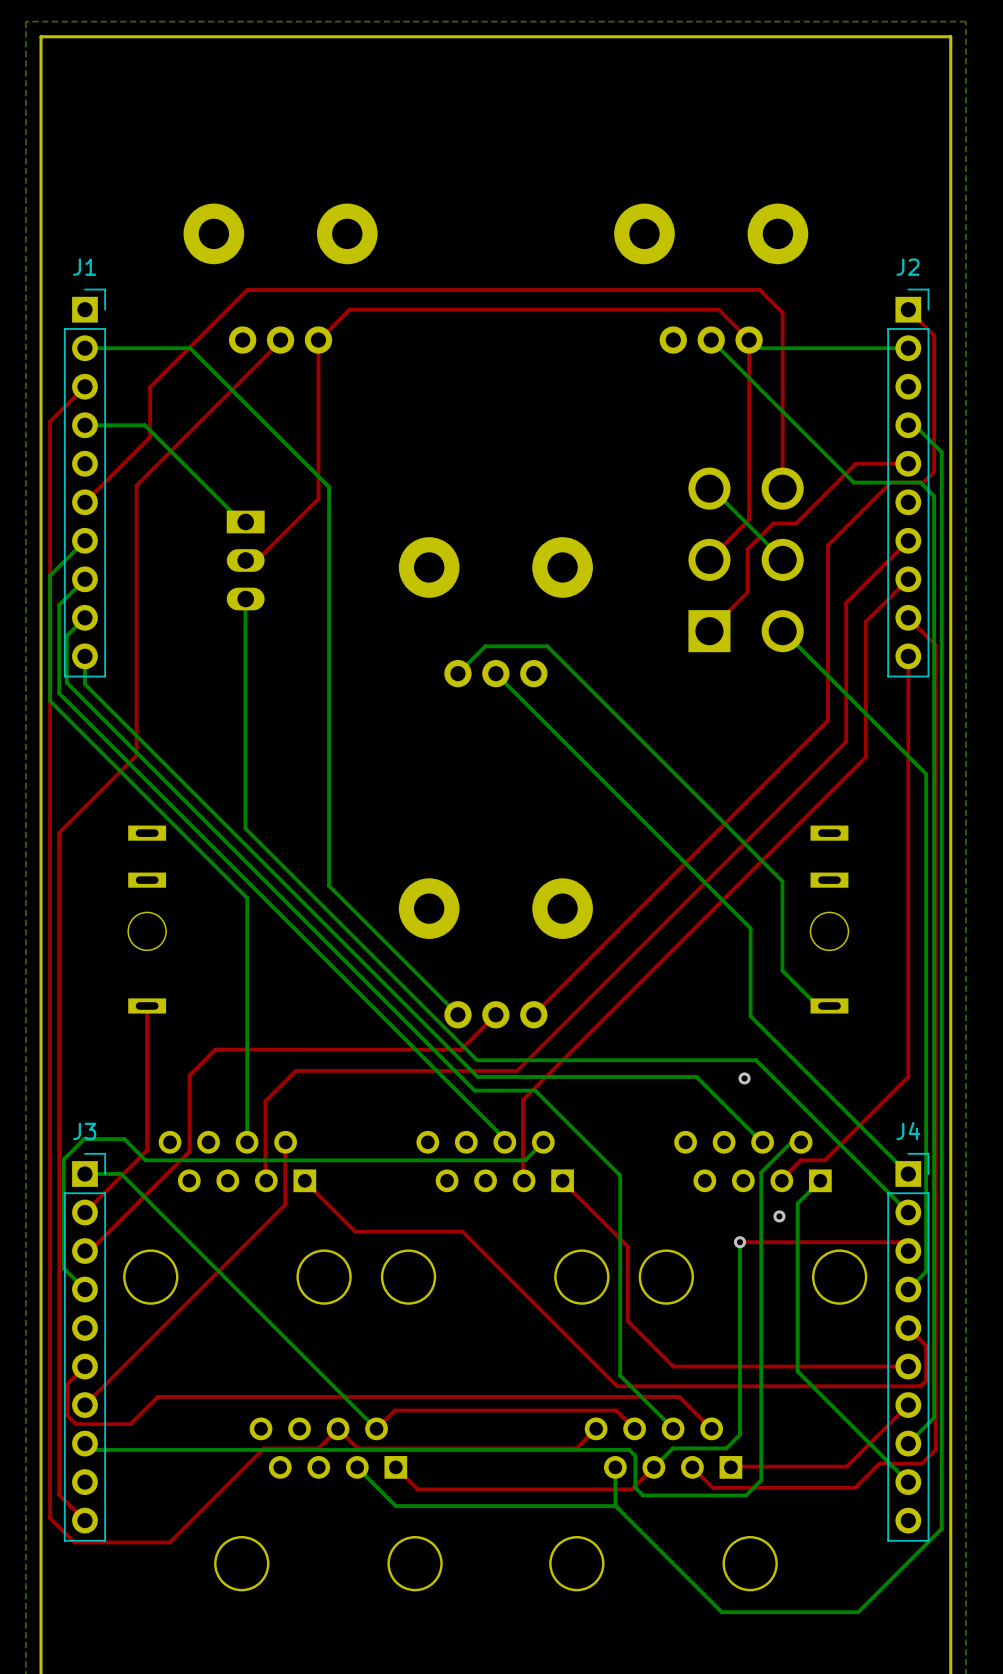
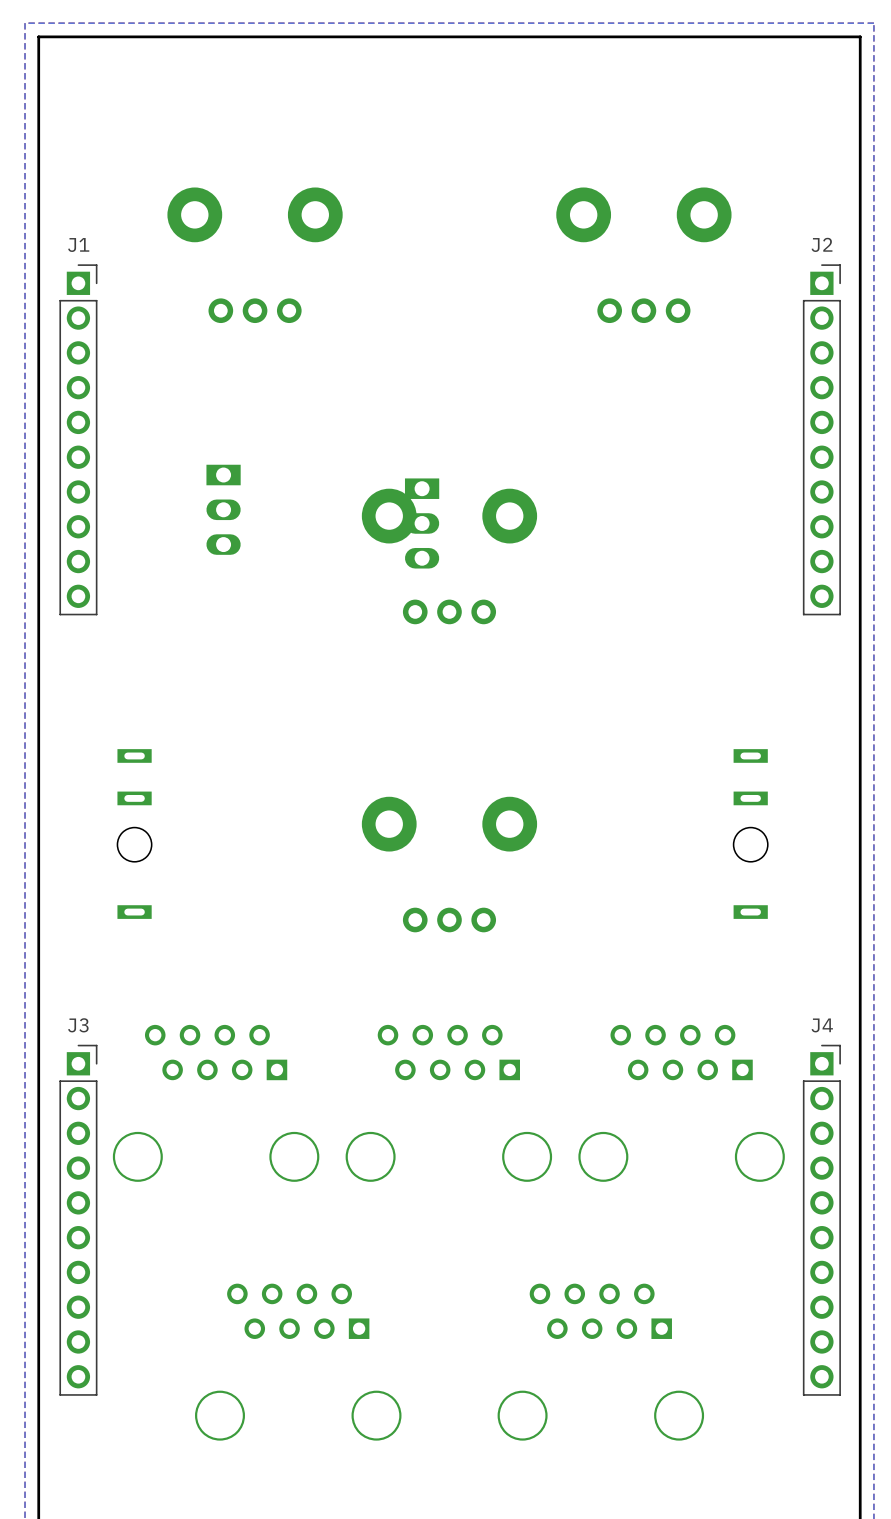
top track: (908, 309) (934, 335) (934, 471) (923, 482) (890, 482) (827, 545) (827, 720) (533, 1014) -> none
top track: (280, 340) (136, 485) (136, 755) (59, 832) (59, 1494) (84, 1520) -> none
bottom track: (711, 340) (853, 482) (920, 482) (934, 496) (934, 1417) (908, 1443) -> none
bottom track: (749, 340) (757, 348) (908, 348) -> none
bottom track: (84, 348) (190, 348) (329, 487) (329, 885) (457, 1014) -> none
top track: (84, 386) (50, 421) (50, 1518) (74, 1542) (169, 1542) (263, 1448) (318, 1448) (338, 1428) (357, 1448) (576, 1448) (596, 1428) -> none
bottom track: (84, 425) (144, 425) (245, 525) -> none
bottom track: (908, 425) (914, 425) (941, 452) (941, 1528) (858, 1612) (721, 1612) (615, 1506) (395, 1506) (357, 1467) -> none
top track: (908, 463) (855, 463) (796, 523) (773, 523) (747, 549) (747, 592) (709, 630) -> none
bottom track: (709, 488) (782, 559) -> none
top track: (782, 488) (782, 312) (759, 289) (247, 289) (150, 387) (150, 437) (84, 502) -> none
bottom track: (84, 540) (50, 575) (50, 700) (247, 898) (247, 1140) -> none
top track: (908, 540) (846, 602) (846, 741) (517, 1070) (295, 1070) (265, 1101) (266, 1180) -> none
top track: (709, 559) (749, 519) (749, 340) (718, 309) (349, 309) (318, 340) (318, 498) (253, 564) (245, 564) -> none
part: (746, 559) -> none
part: none -> (422, 523)
bottom track: (84, 579) (59, 605) (59, 693) (504, 1138) (503, 1141) -> none
top track: (908, 579) (865, 621) (865, 757) (522, 1099) (522, 1180) -> none
bottom track: (245, 602) (245, 828) (477, 1060) (756, 1060) (908, 1212) -> none
bottom track: (84, 617) (66, 636) (66, 682) (474, 1090) (535, 1090) (620, 1175) (620, 1375) (673, 1428) -> none
top track: (908, 617) (935, 645) (935, 1449) (921, 1463) (879, 1463) (855, 1487) (712, 1487) (692, 1467) -> none
bottom track: (782, 630) (926, 774) (926, 1271) (908, 1289) -> none
bottom track: (84, 656) (84, 684) (477, 1076) (696, 1076) (762, 1142) -> none
top track: (908, 656) (908, 1076) (824, 1160) (800, 1160) (780, 1180) -> none
bottom track: (457, 673) (485, 646) (547, 646) (782, 881) (782, 970) (817, 1005) (829, 1005) -> none
bottom track: (495, 673) (750, 928) (750, 1016) (908, 1173) -> none
top track: (147, 1005) (147, 1150) (84, 1212) -> none
top track: (495, 1014) (461, 1049) (215, 1049) (189, 1075) (189, 1151) (89, 1251) (84, 1251) -> none
via: (744, 1078) -> none
bottom track: (800, 1141) (791, 1142) (761, 1172) (761, 1480) (746, 1495) (642, 1495) (635, 1487) (635, 1456) (629, 1449) (91, 1449) (84, 1443) -> none
top track: (285, 1142) (285, 1204) (84, 1405) -> none
bottom track: (543, 1142) (525, 1160) (145, 1160) (124, 1139) (84, 1139) (63, 1159) (63, 1268) (84, 1289) -> none
bottom track: (84, 1173) (121, 1173) (376, 1428) -> none
top track: (304, 1180) (354, 1231) (462, 1231) (617, 1386) (920, 1386) (926, 1380) (926, 1345) (908, 1328) -> none
top track: (562, 1180) (627, 1246) (627, 1321) (673, 1366) (908, 1366) -> none
bottom track: (820, 1180) (797, 1203) (797, 1371) (908, 1482) -> none
via: (779, 1216) -> none
top track: (740, 1242) (899, 1242) (908, 1251) -> none
bottom track: (740, 1242) (740, 1434) (726, 1448) (672, 1448) (653, 1467) -> none
via: (740, 1242) -> none
top track: (84, 1366) (67, 1384) (67, 1415) (75, 1424) (130, 1424) (157, 1396) (679, 1396) (712, 1429) -> none
top track: (908, 1405) (846, 1466) (730, 1467) -> none
top track: (634, 1428) (616, 1410) (394, 1410) (376, 1428) -> none
bottom track: (615, 1467) (615, 1506) -> none
top track: (653, 1467) (631, 1489) (417, 1489) (395, 1467) -> none

